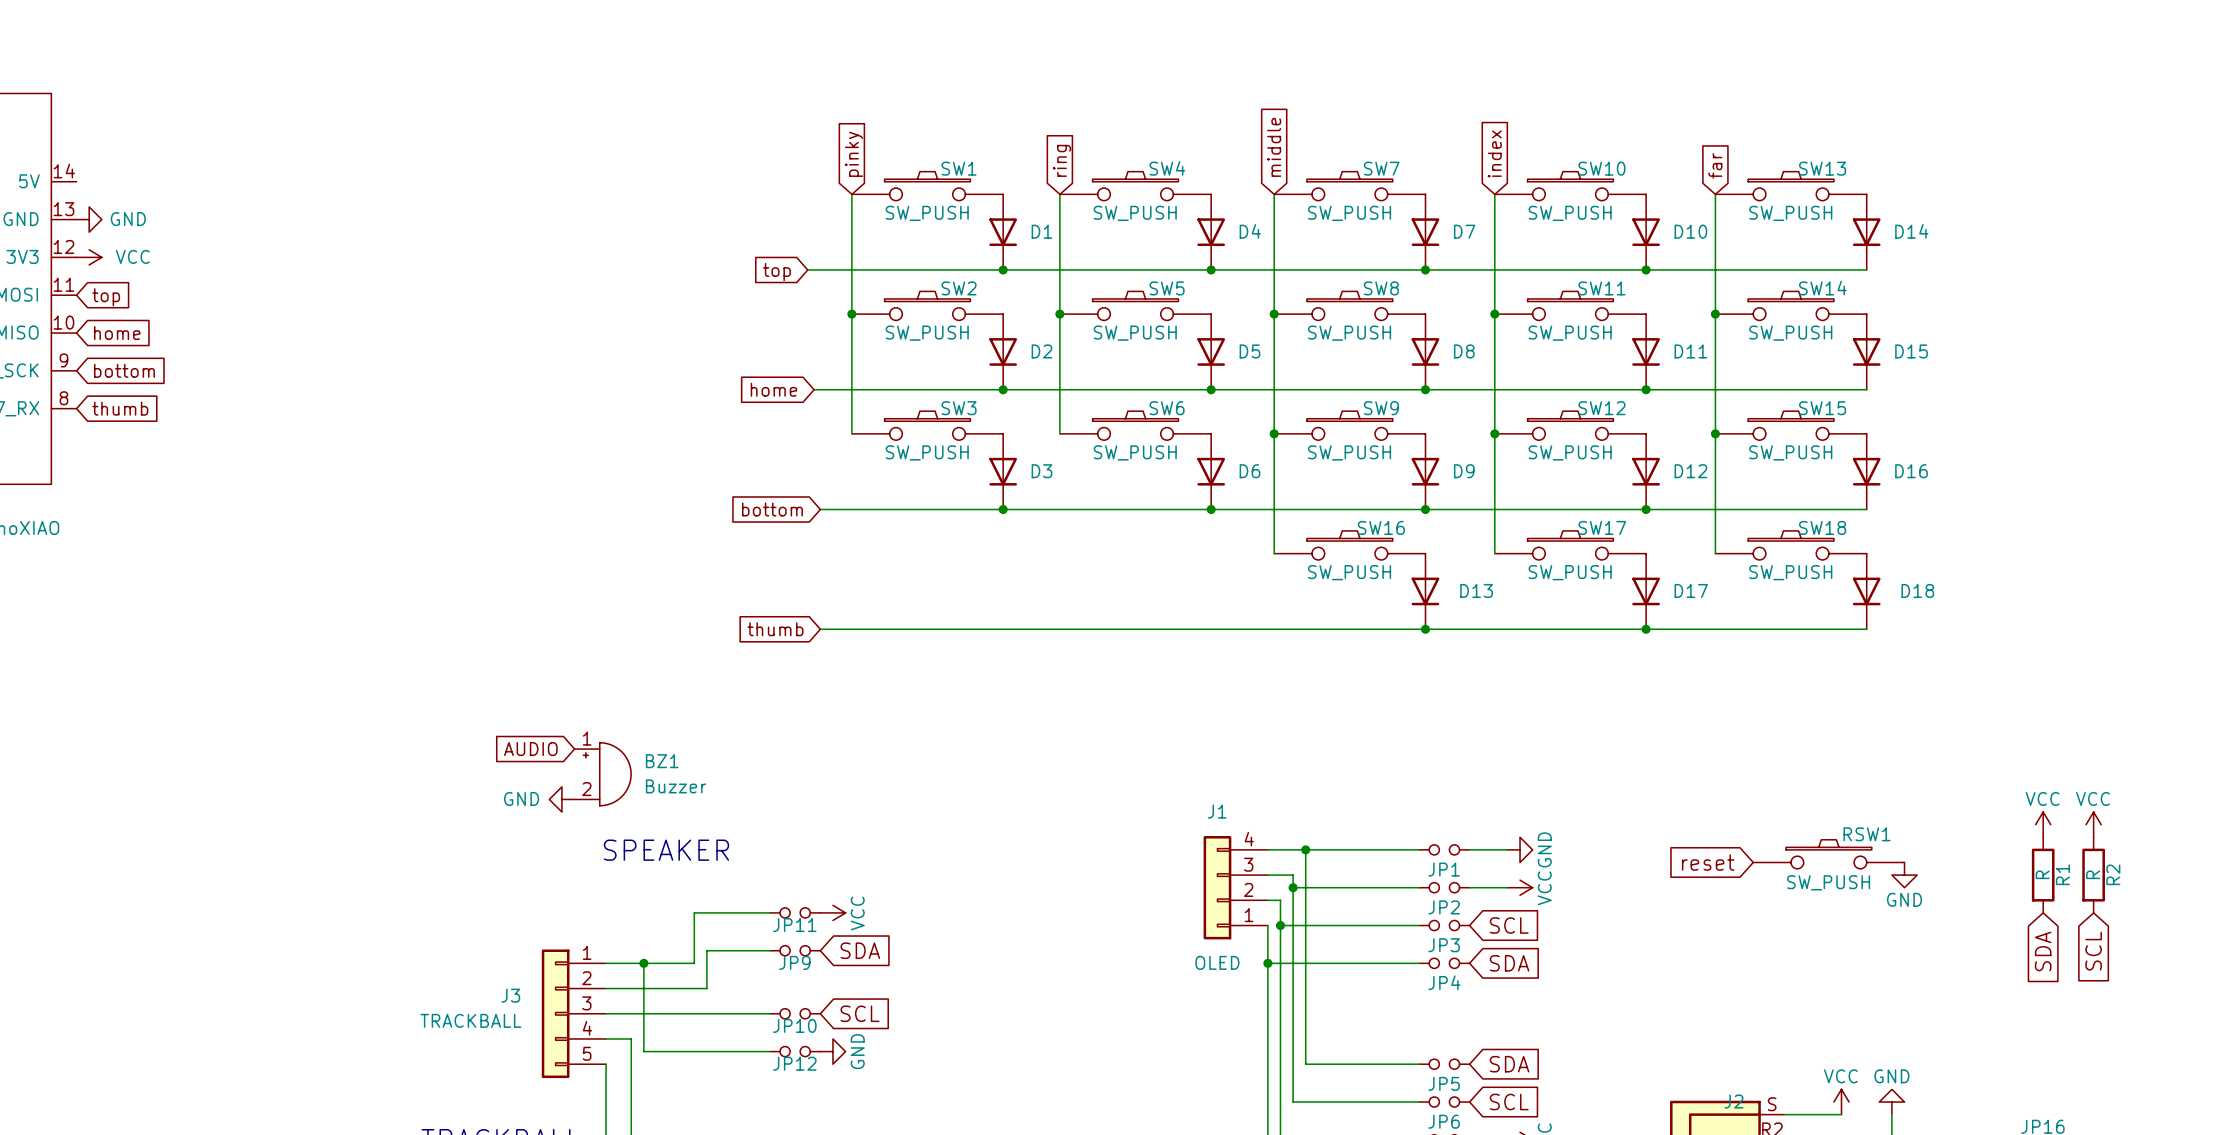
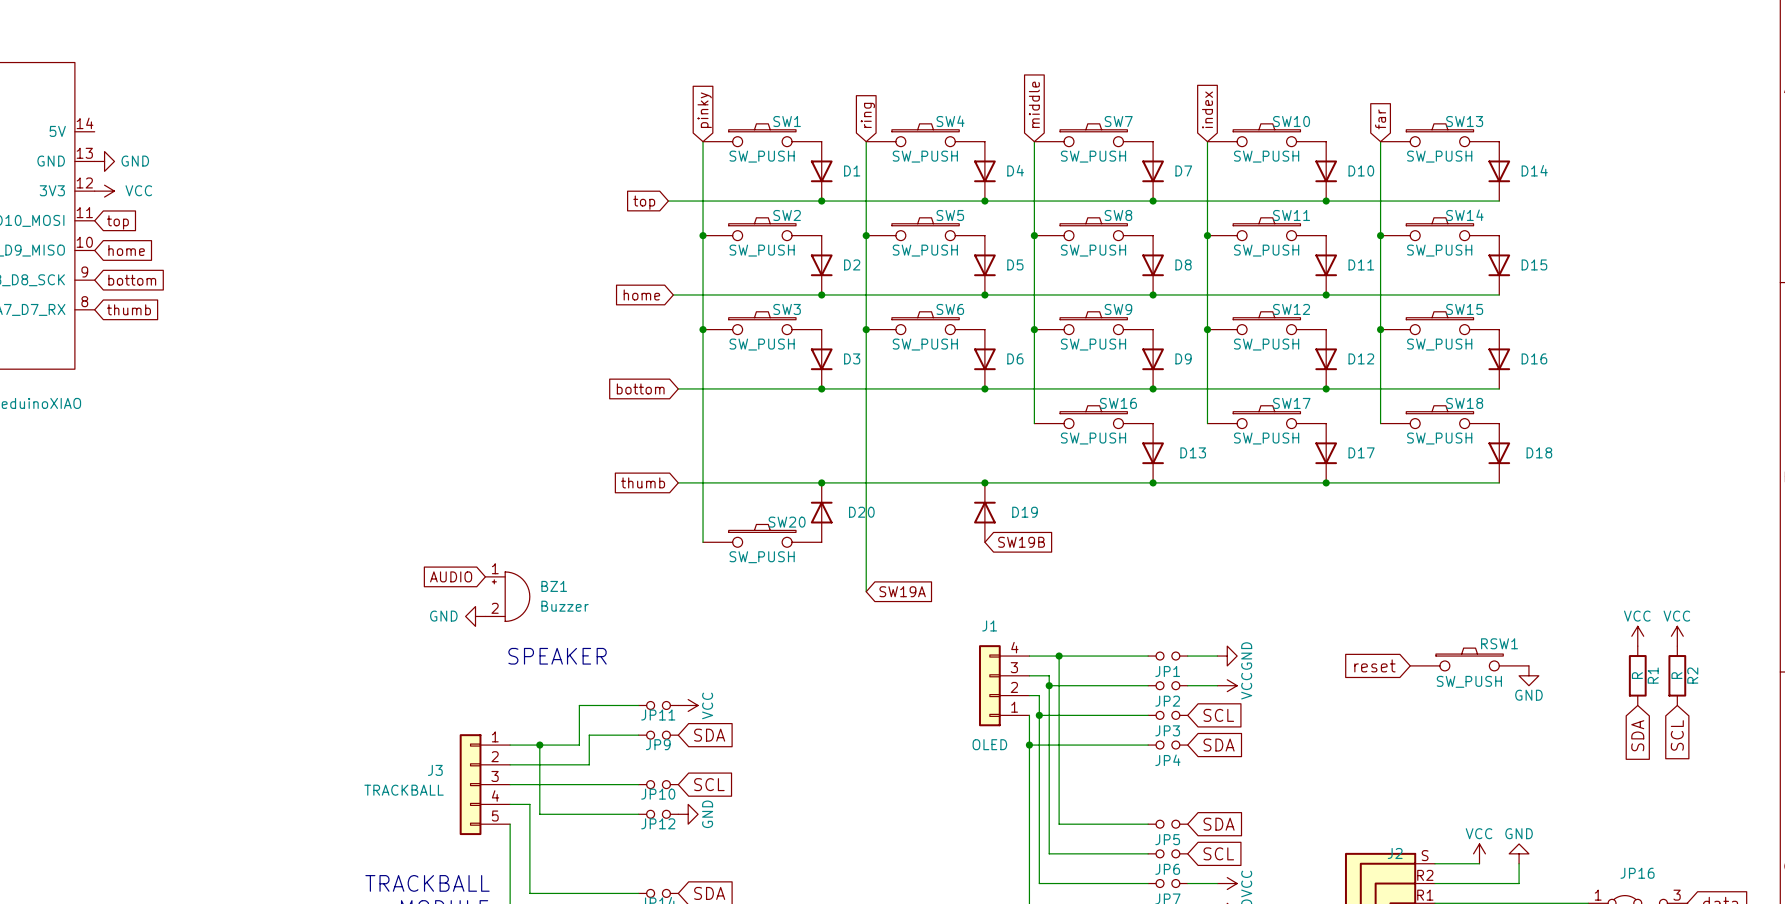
wire: none -> (703, 329) (703, 542)
junction: none -> (703, 329)
wire: none -> (866, 329) (866, 591)
junction: none -> (866, 329)
junction: none -> (821, 482)
junction: none -> (984, 482)
D20: none -> (821, 512)
D19: none -> (984, 512)
SW20: none -> SW_PUSH (762, 535)
global label: none -> SW19B (1021, 542)
global label: none -> SW19A (902, 591)

